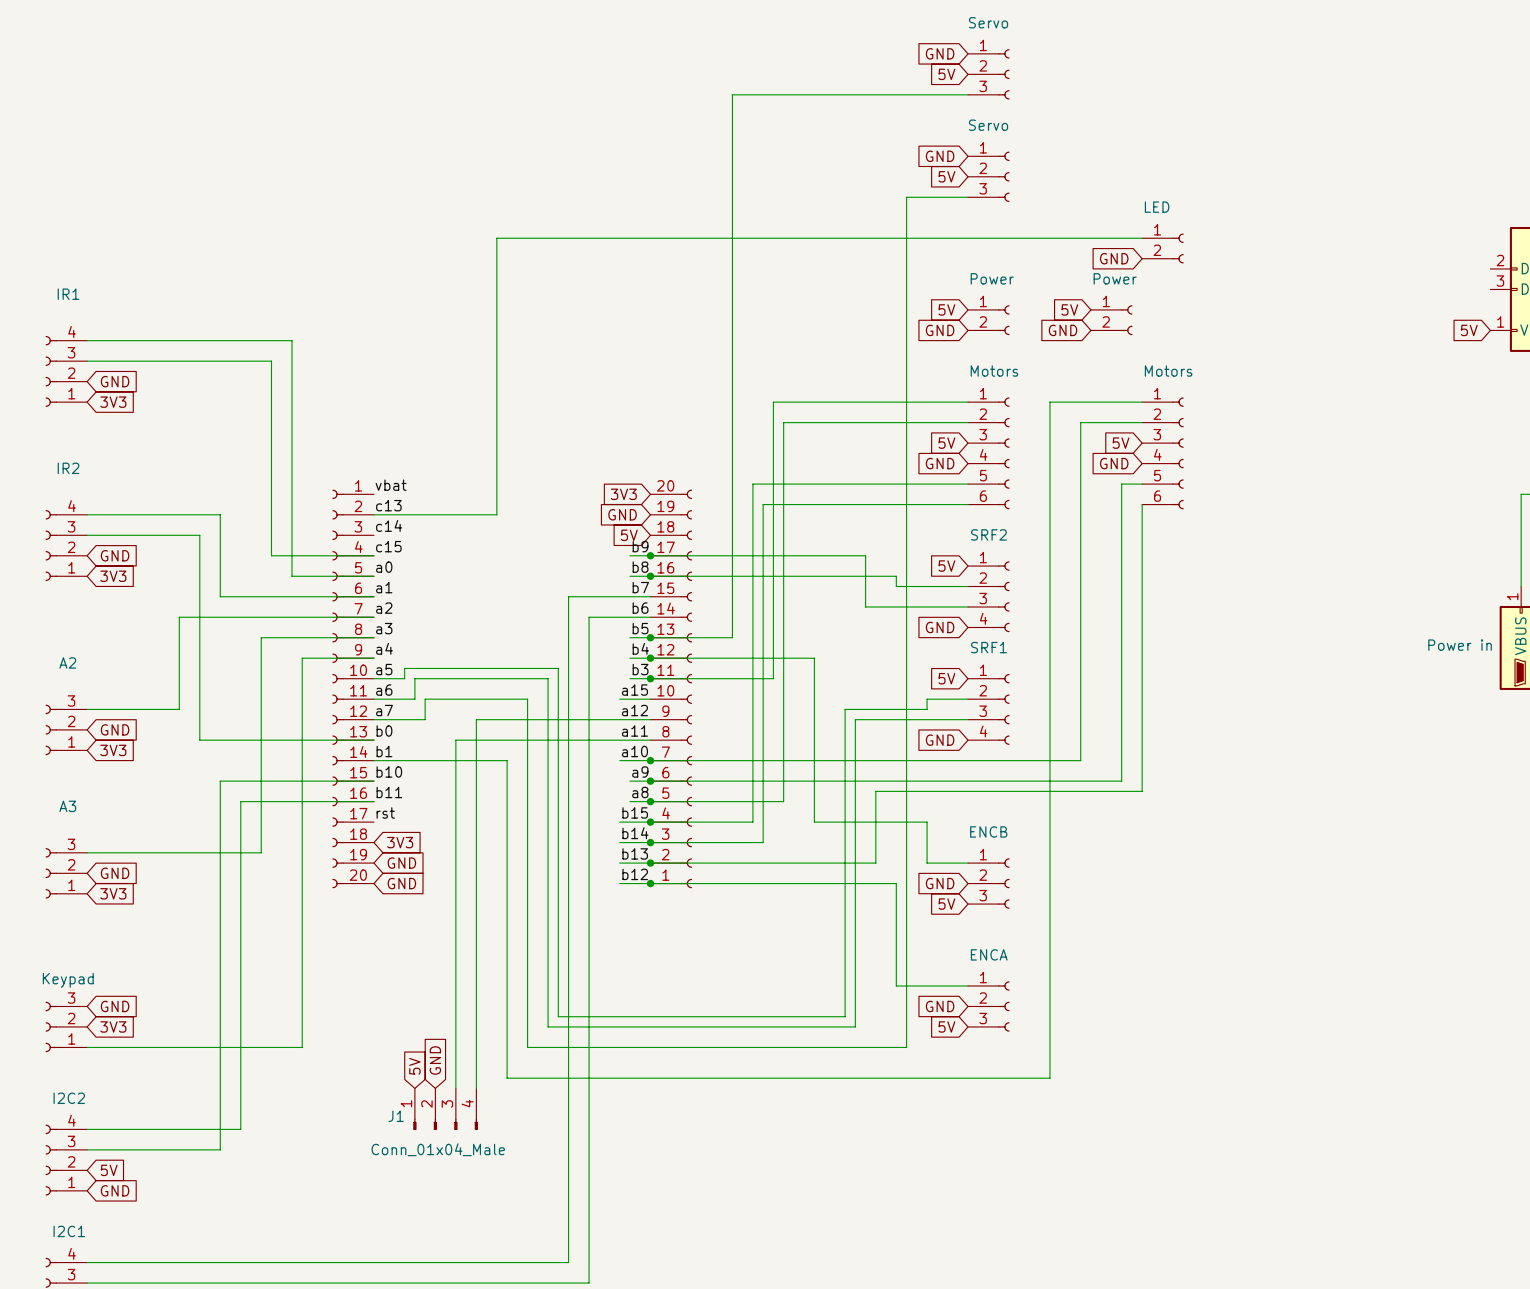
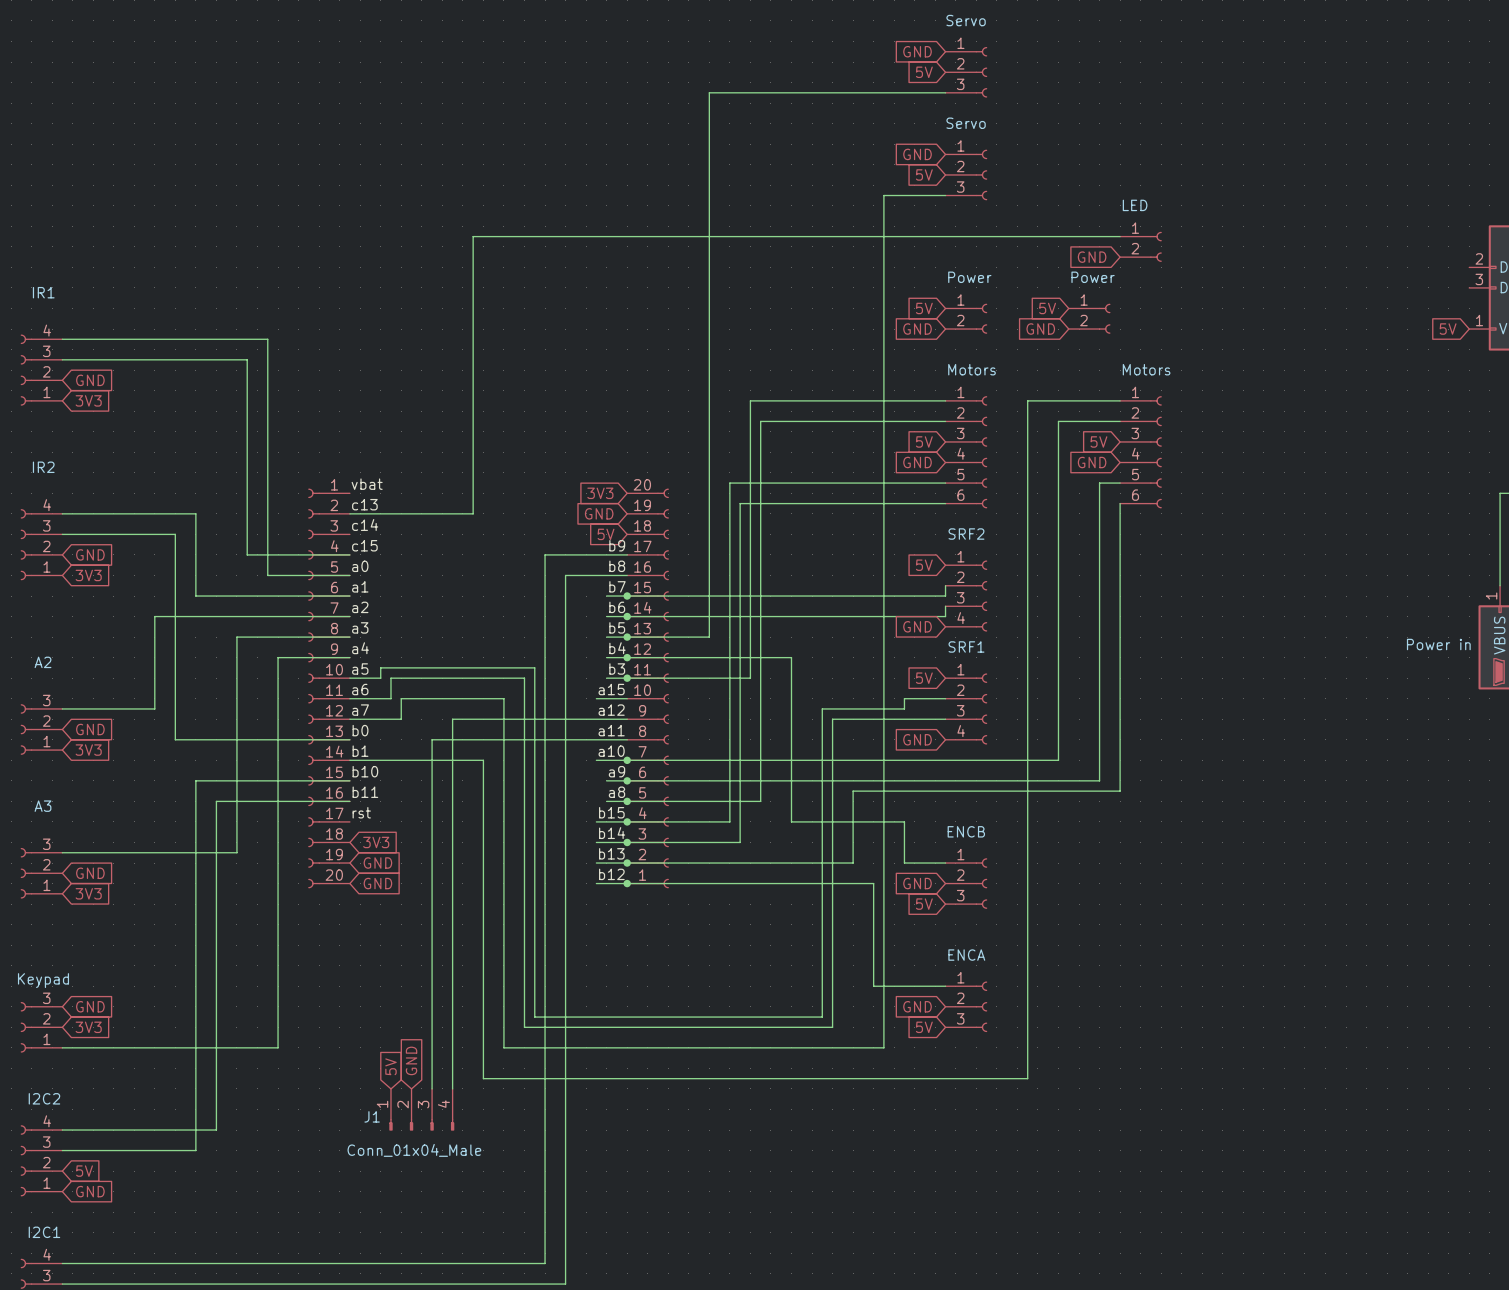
wire: (650, 555) (865, 555) (865, 607) (968, 607) -> (627, 616) (945, 616) (945, 606)
junction: (650, 555) -> none
wire: (650, 576) (896, 576) (896, 586) (968, 586) -> (627, 596) (945, 596) (945, 585)
junction: (650, 576) -> none
wire: (568, 596) (630, 596) -> (545, 596) (545, 554) (606, 554)
junction: none -> (627, 596)
wire: (589, 617) (630, 617) -> (565, 616) (565, 575) (606, 575)
junction: none -> (627, 616)

